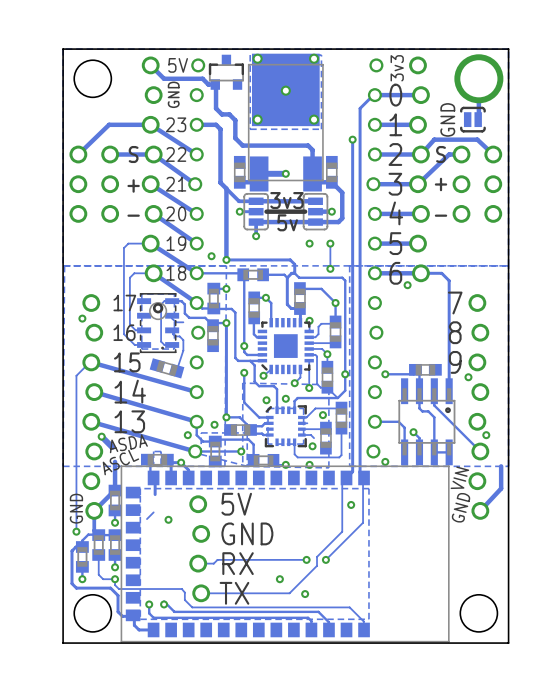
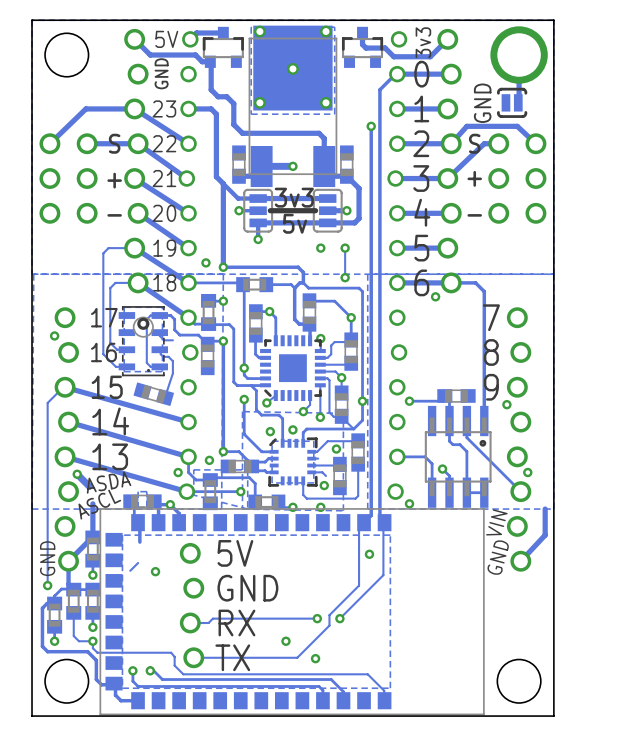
track: none -> (223, 32) (196, 32) (190, 39)
track: none -> (362, 32) (362, 44) (366, 48) (385, 48) (393, 56) (430, 56) (447, 39)
part: none -> (362, 47)

